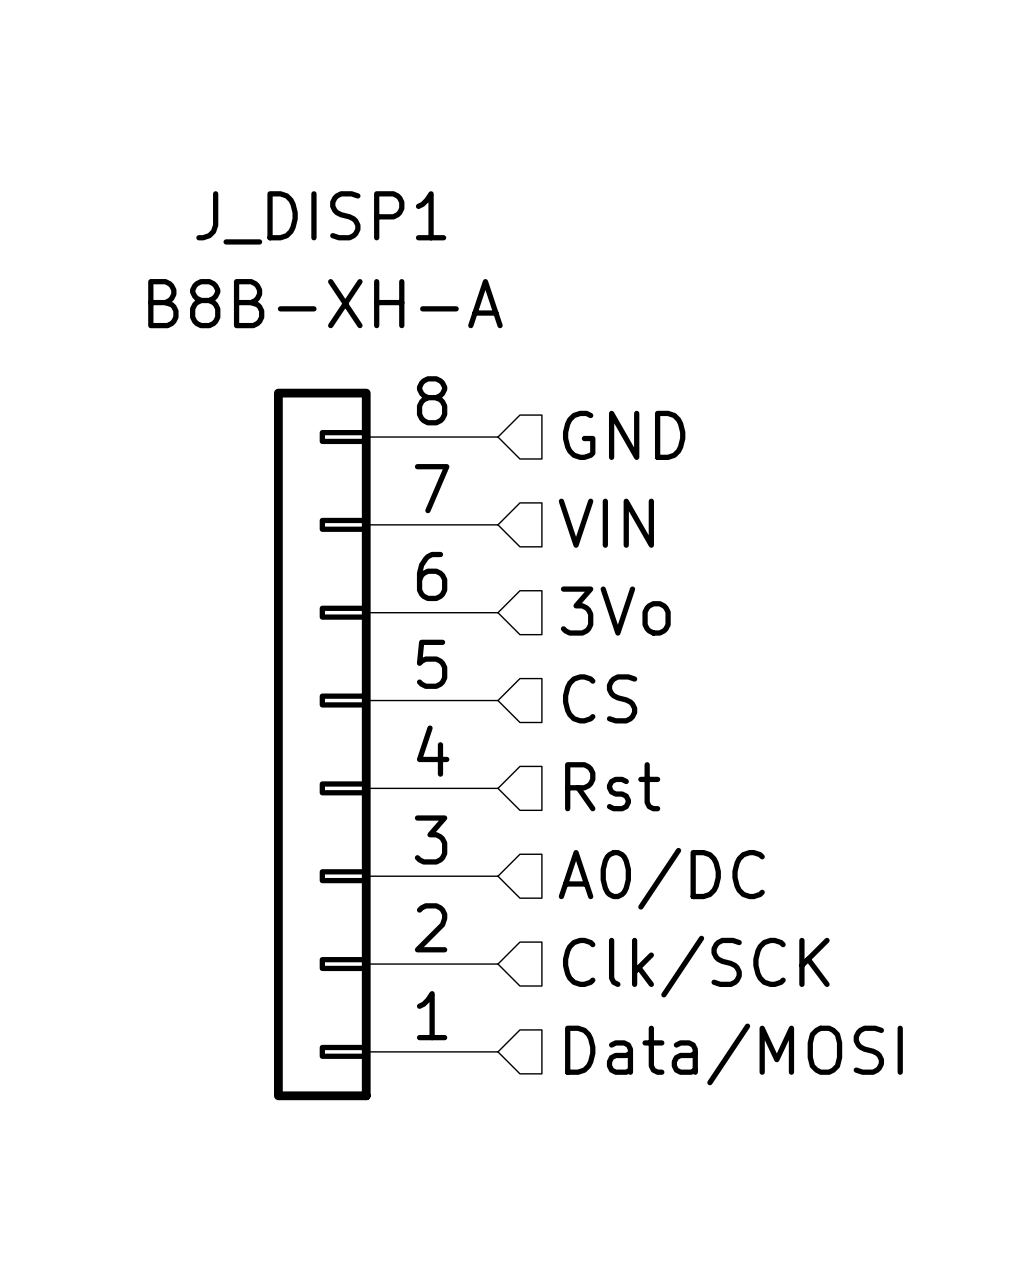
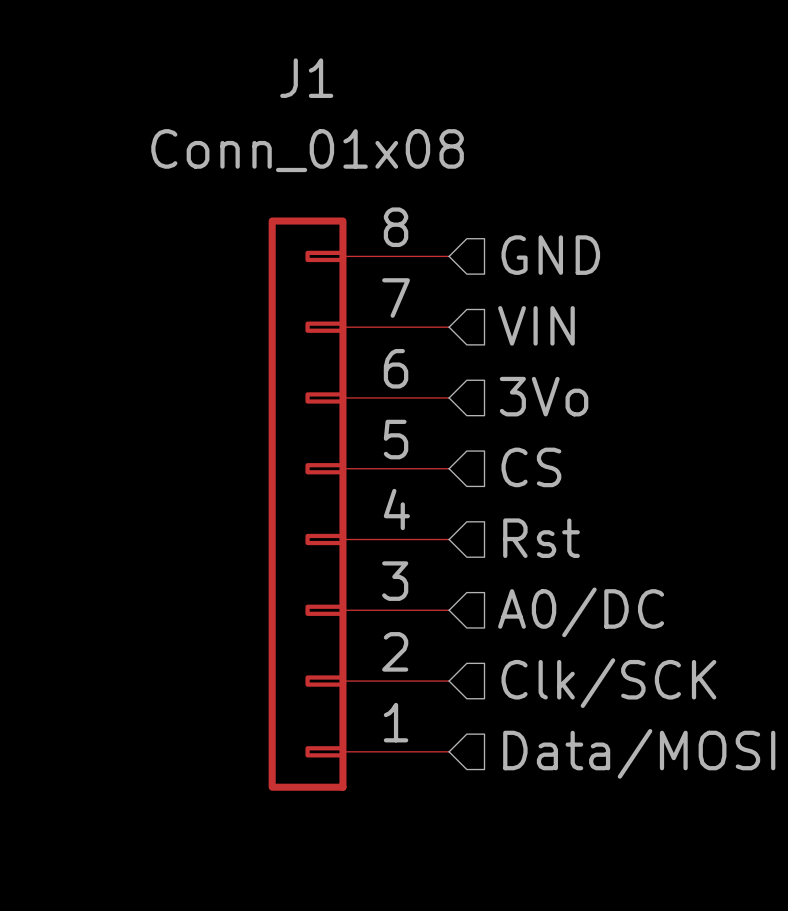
J_DISP1 name: J_DISP1 (321, 217) -> J1 (306, 78)
J_DISP1 value: B8B-XH-A (325, 303) -> Conn_01x08 (307, 150)

